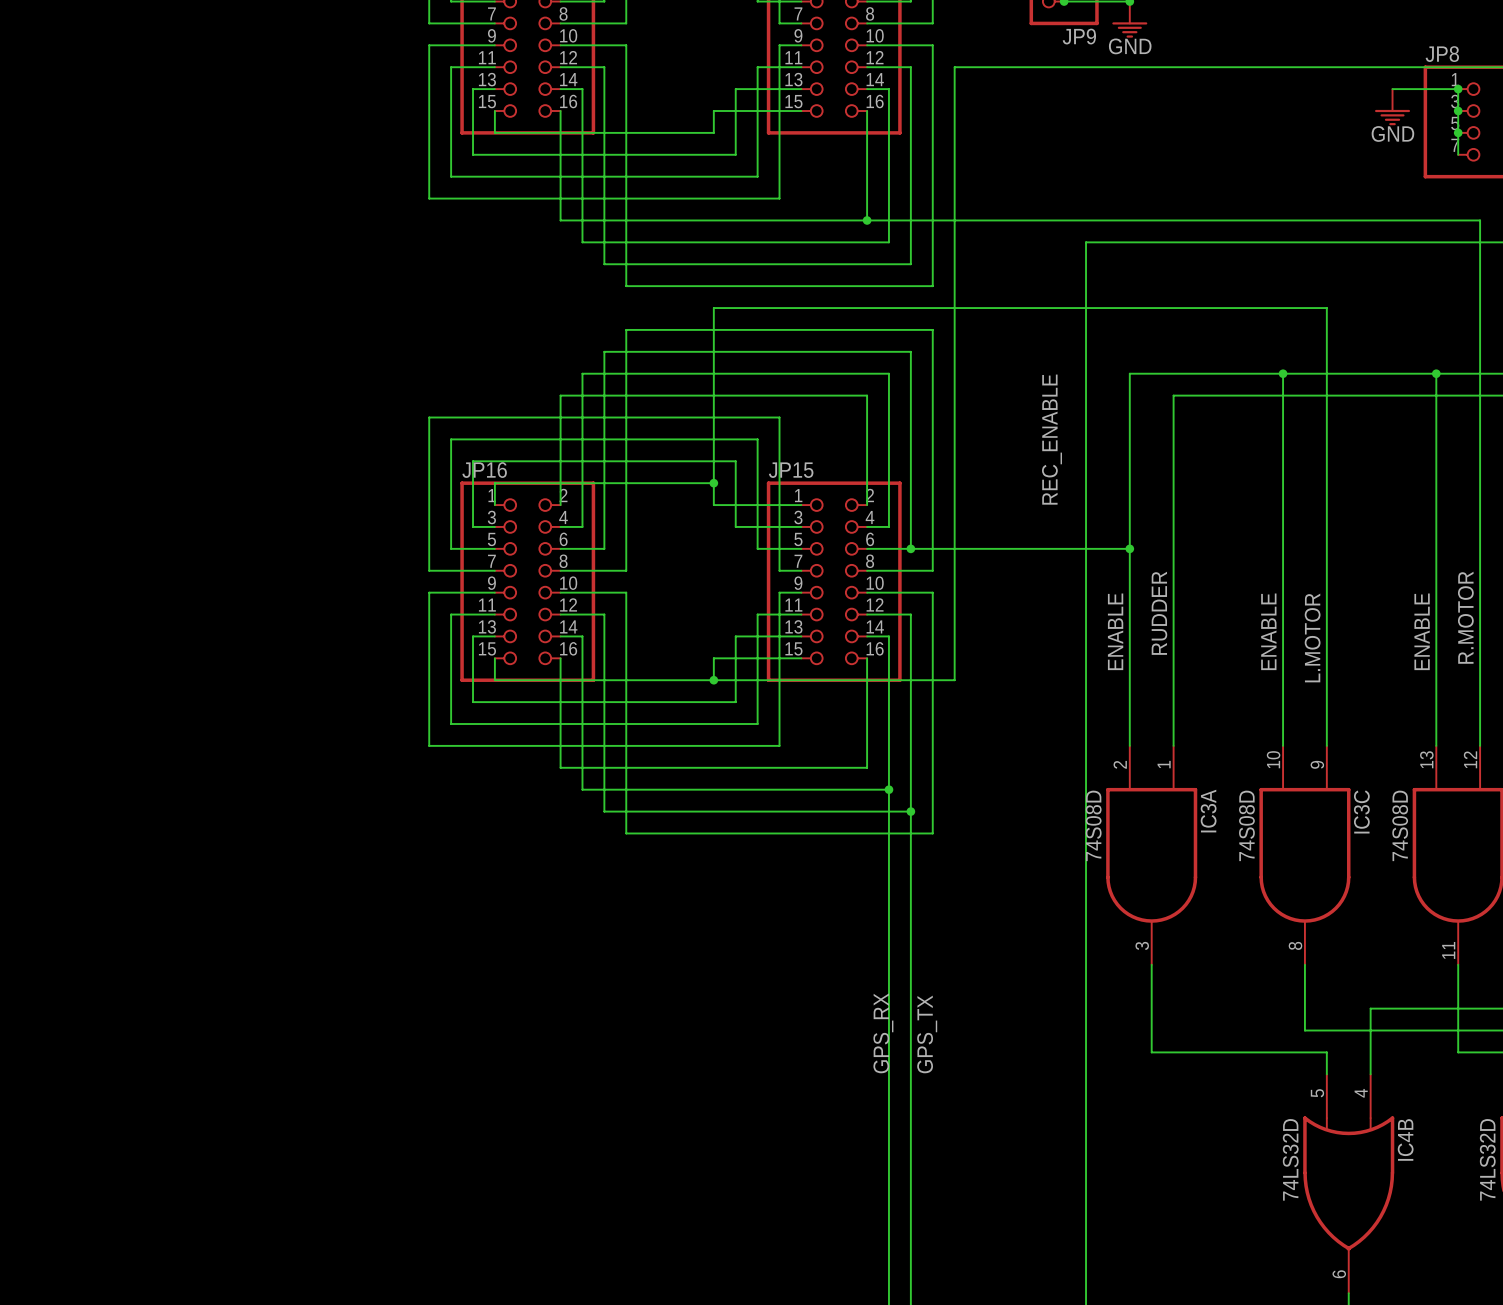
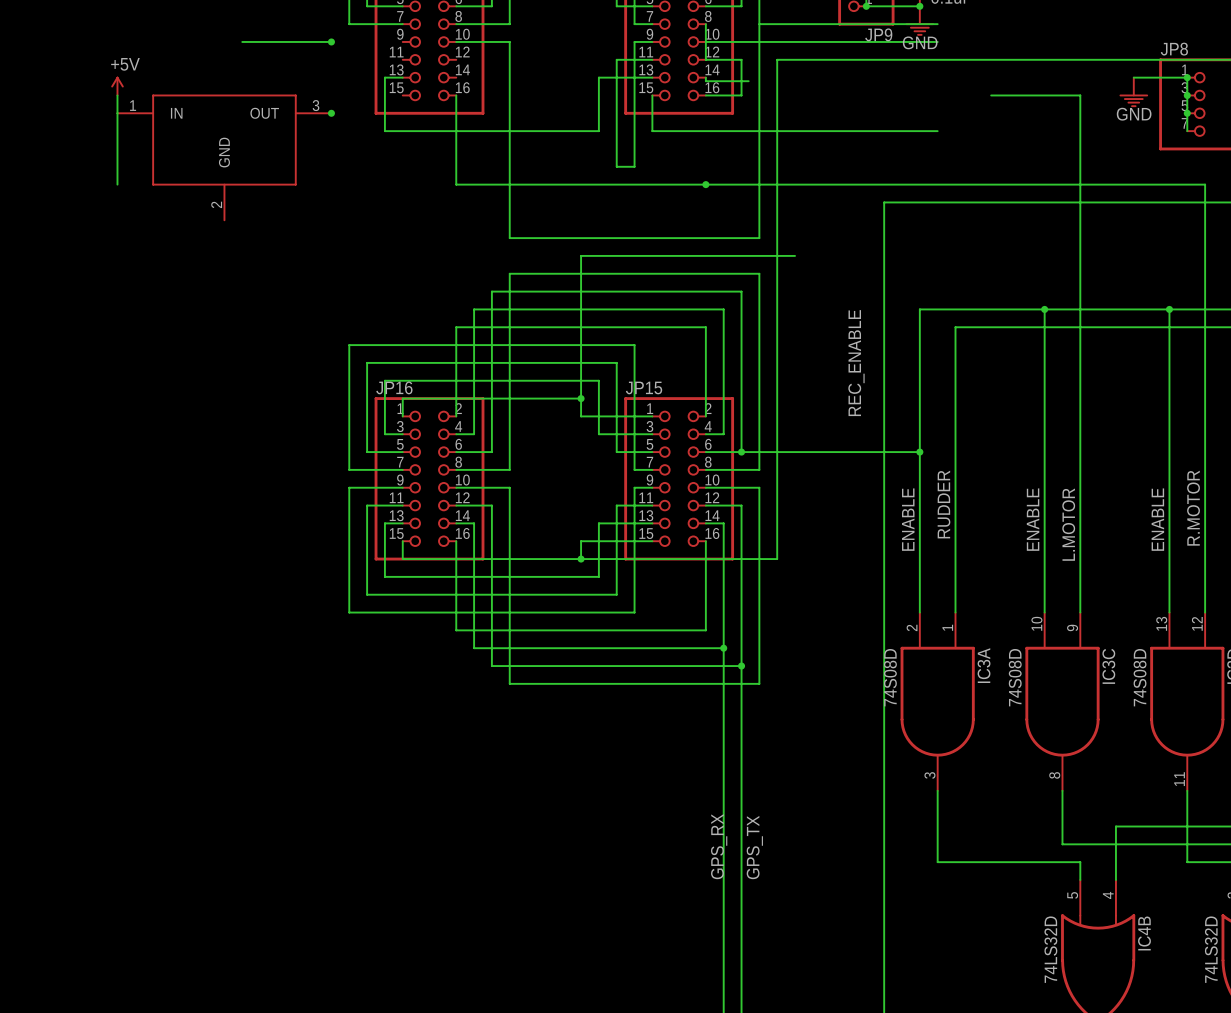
wire: (867, 23) (932, 23) -> (705, 24) (705, 59)
wire: none -> (937, 24) (759, 24) (759, 41) (937, 41)
wire: none -> (242, 41) (331, 41)
junction: none -> (331, 41)
wire: (494, 45) (429, 45) (429, 198) (757, 198) -> (616, 148) (616, 166)
wire: (494, 67) (451, 67) (451, 176) (757, 176) -> none
wire: (560, 67) (604, 67) (604, 264) (910, 264) (910, 111) -> none
wire: (560, 89) (582, 89) (582, 242) (888, 242) (888, 89) (867, 89) -> (748, 81) (705, 81) (705, 77)
power symbol: none -> +5V (117, 86)
wire: none -> (117, 95) (117, 184)
wire: (494, 111) (494, 132) (713, 132) (713, 111) (801, 111) -> (937, 131) (652, 131) (652, 95)
wire: (867, 111) (867, 220) -> (705, 95) (741, 95)
junction: none -> (331, 113)
part: none -> (224, 157)
wire: (976, 308) (1326, 308) -> (991, 95) (1080, 95) (1080, 255)

